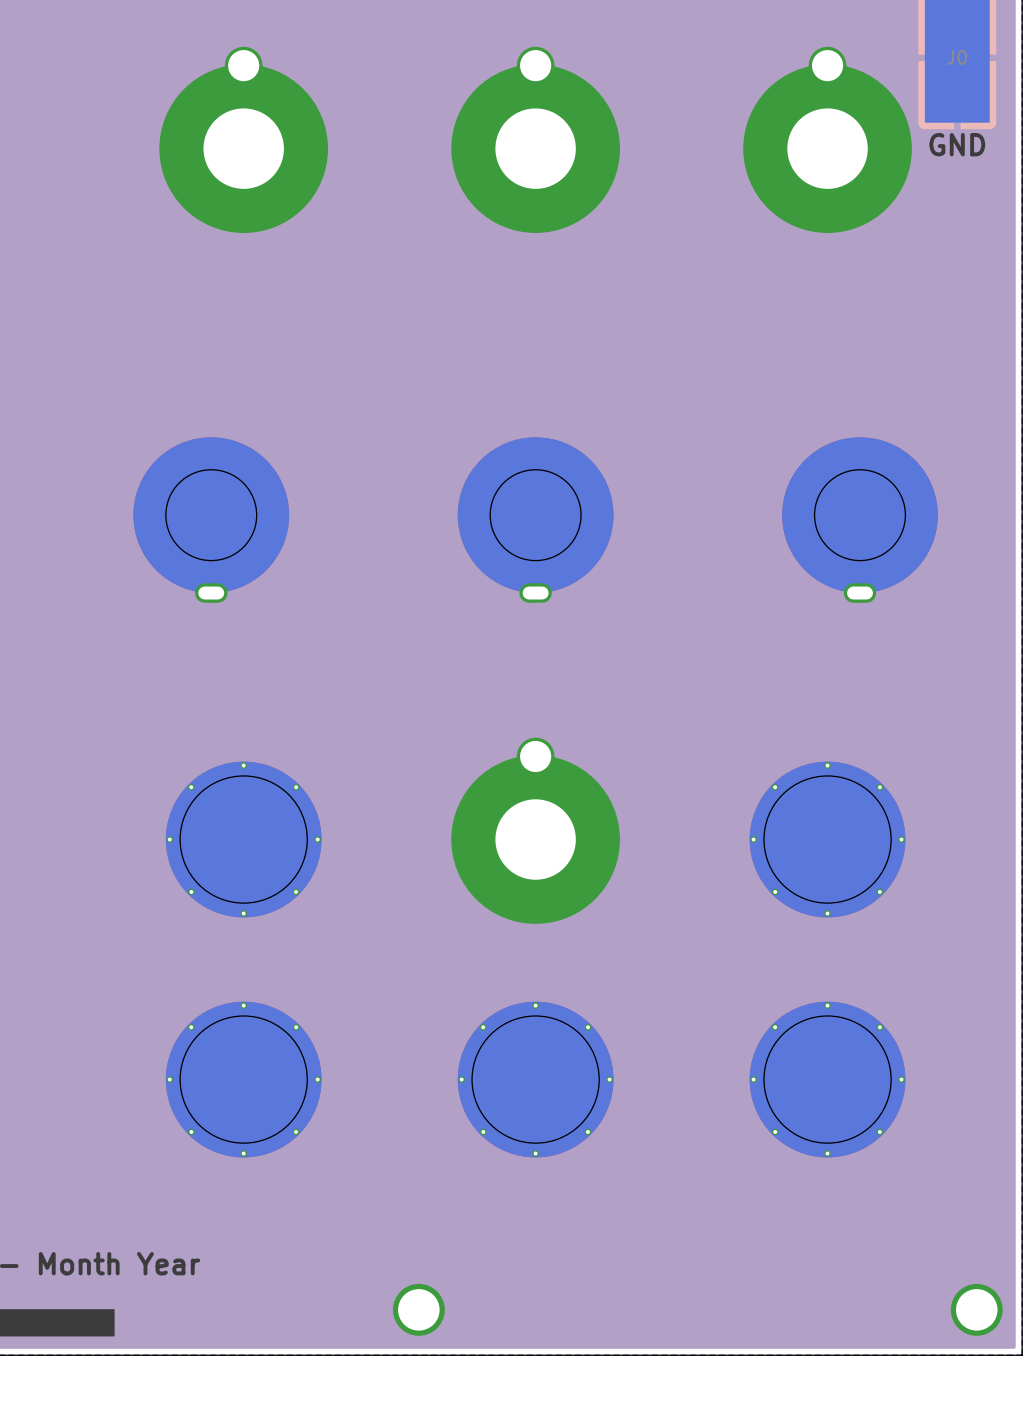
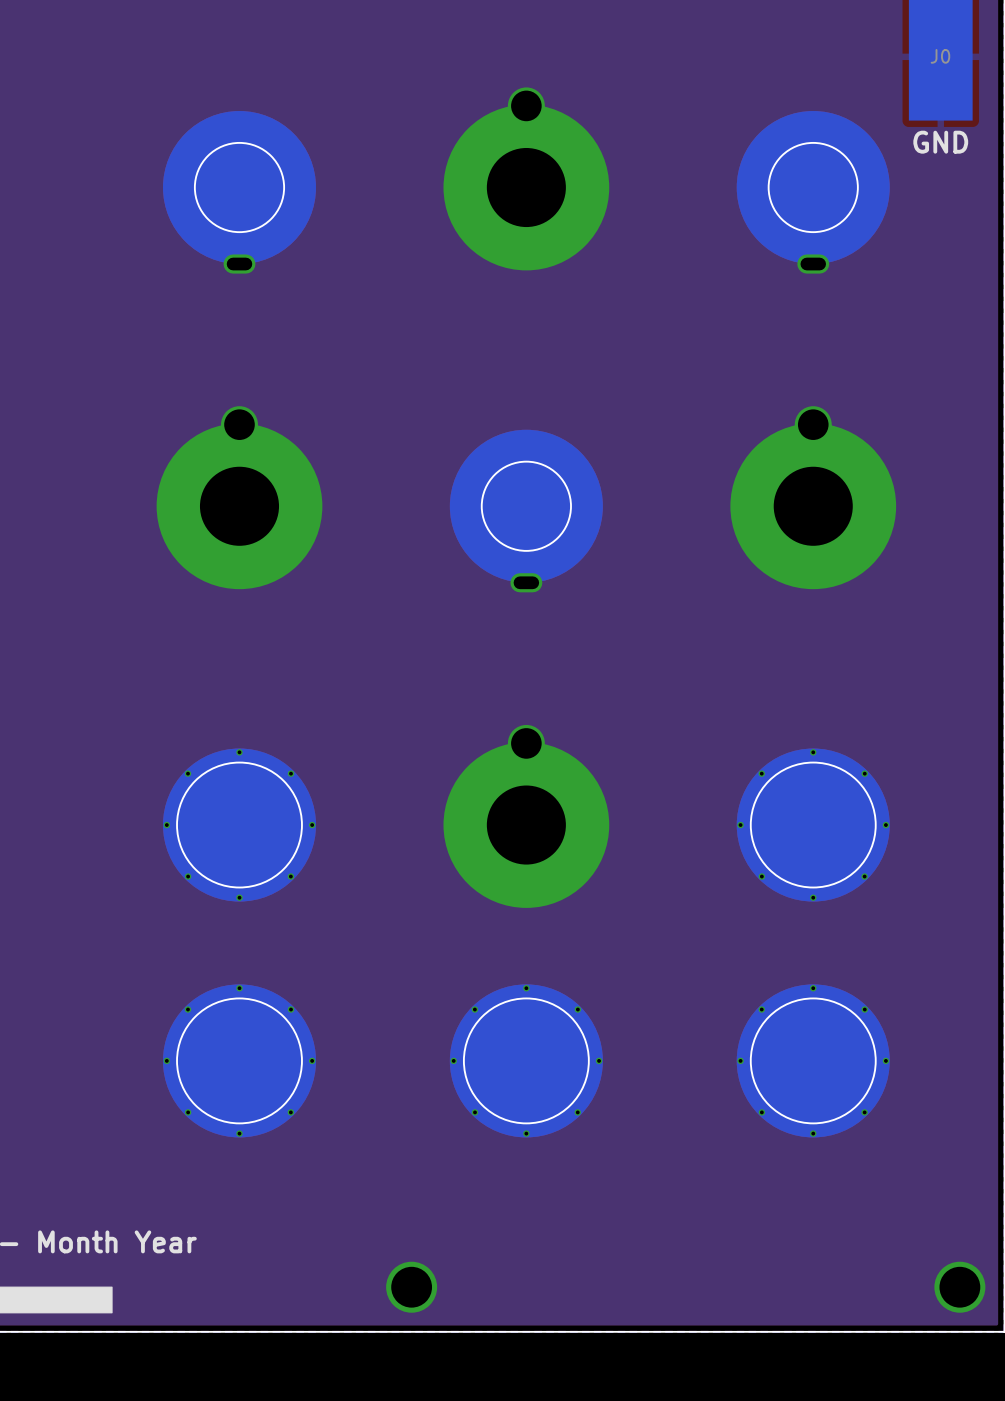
part: (243, 139) -> none
part position: (535, 139) -> (526, 178)
part: (827, 139) -> none
part: none -> (239, 192)
part: none -> (813, 192)
part: none -> (239, 497)
part: none -> (813, 497)
part: (211, 520) -> none
part: (859, 520) -> none

